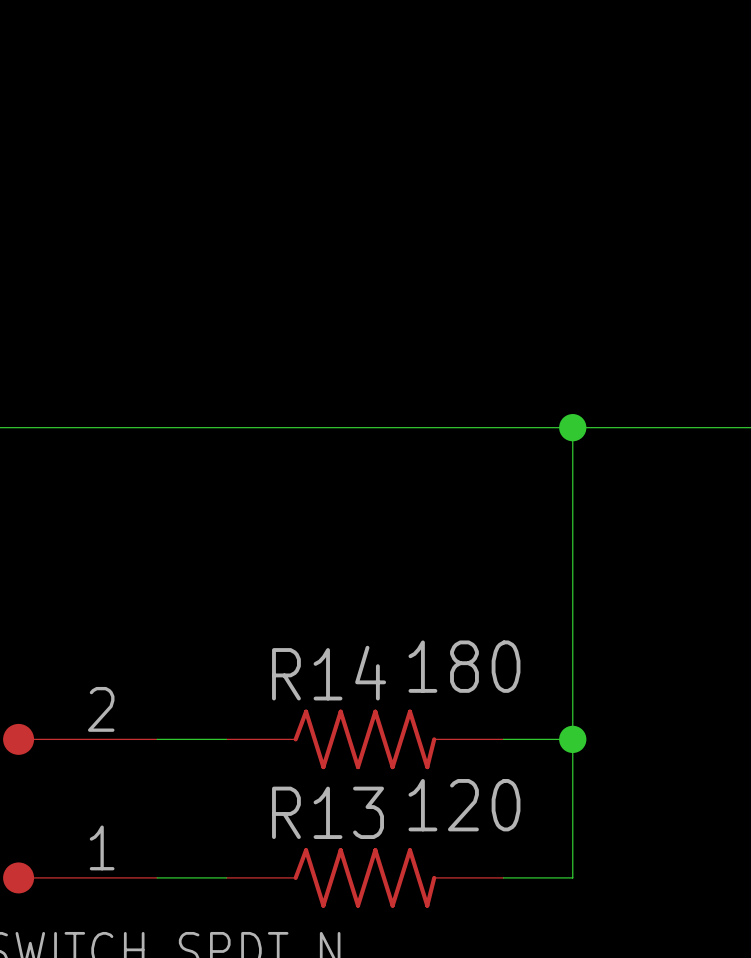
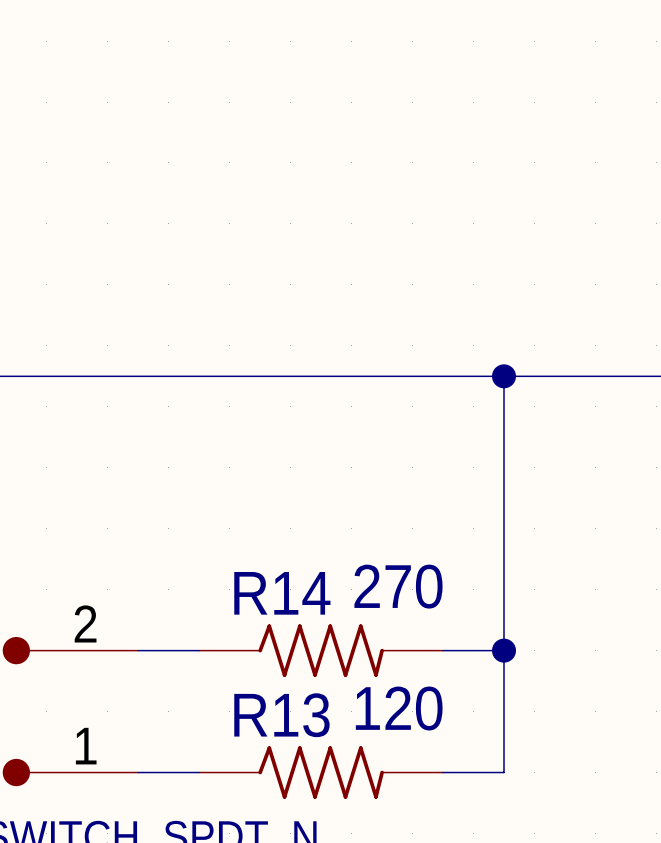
R14 value: 180 (464, 666) -> 270 (398, 586)

